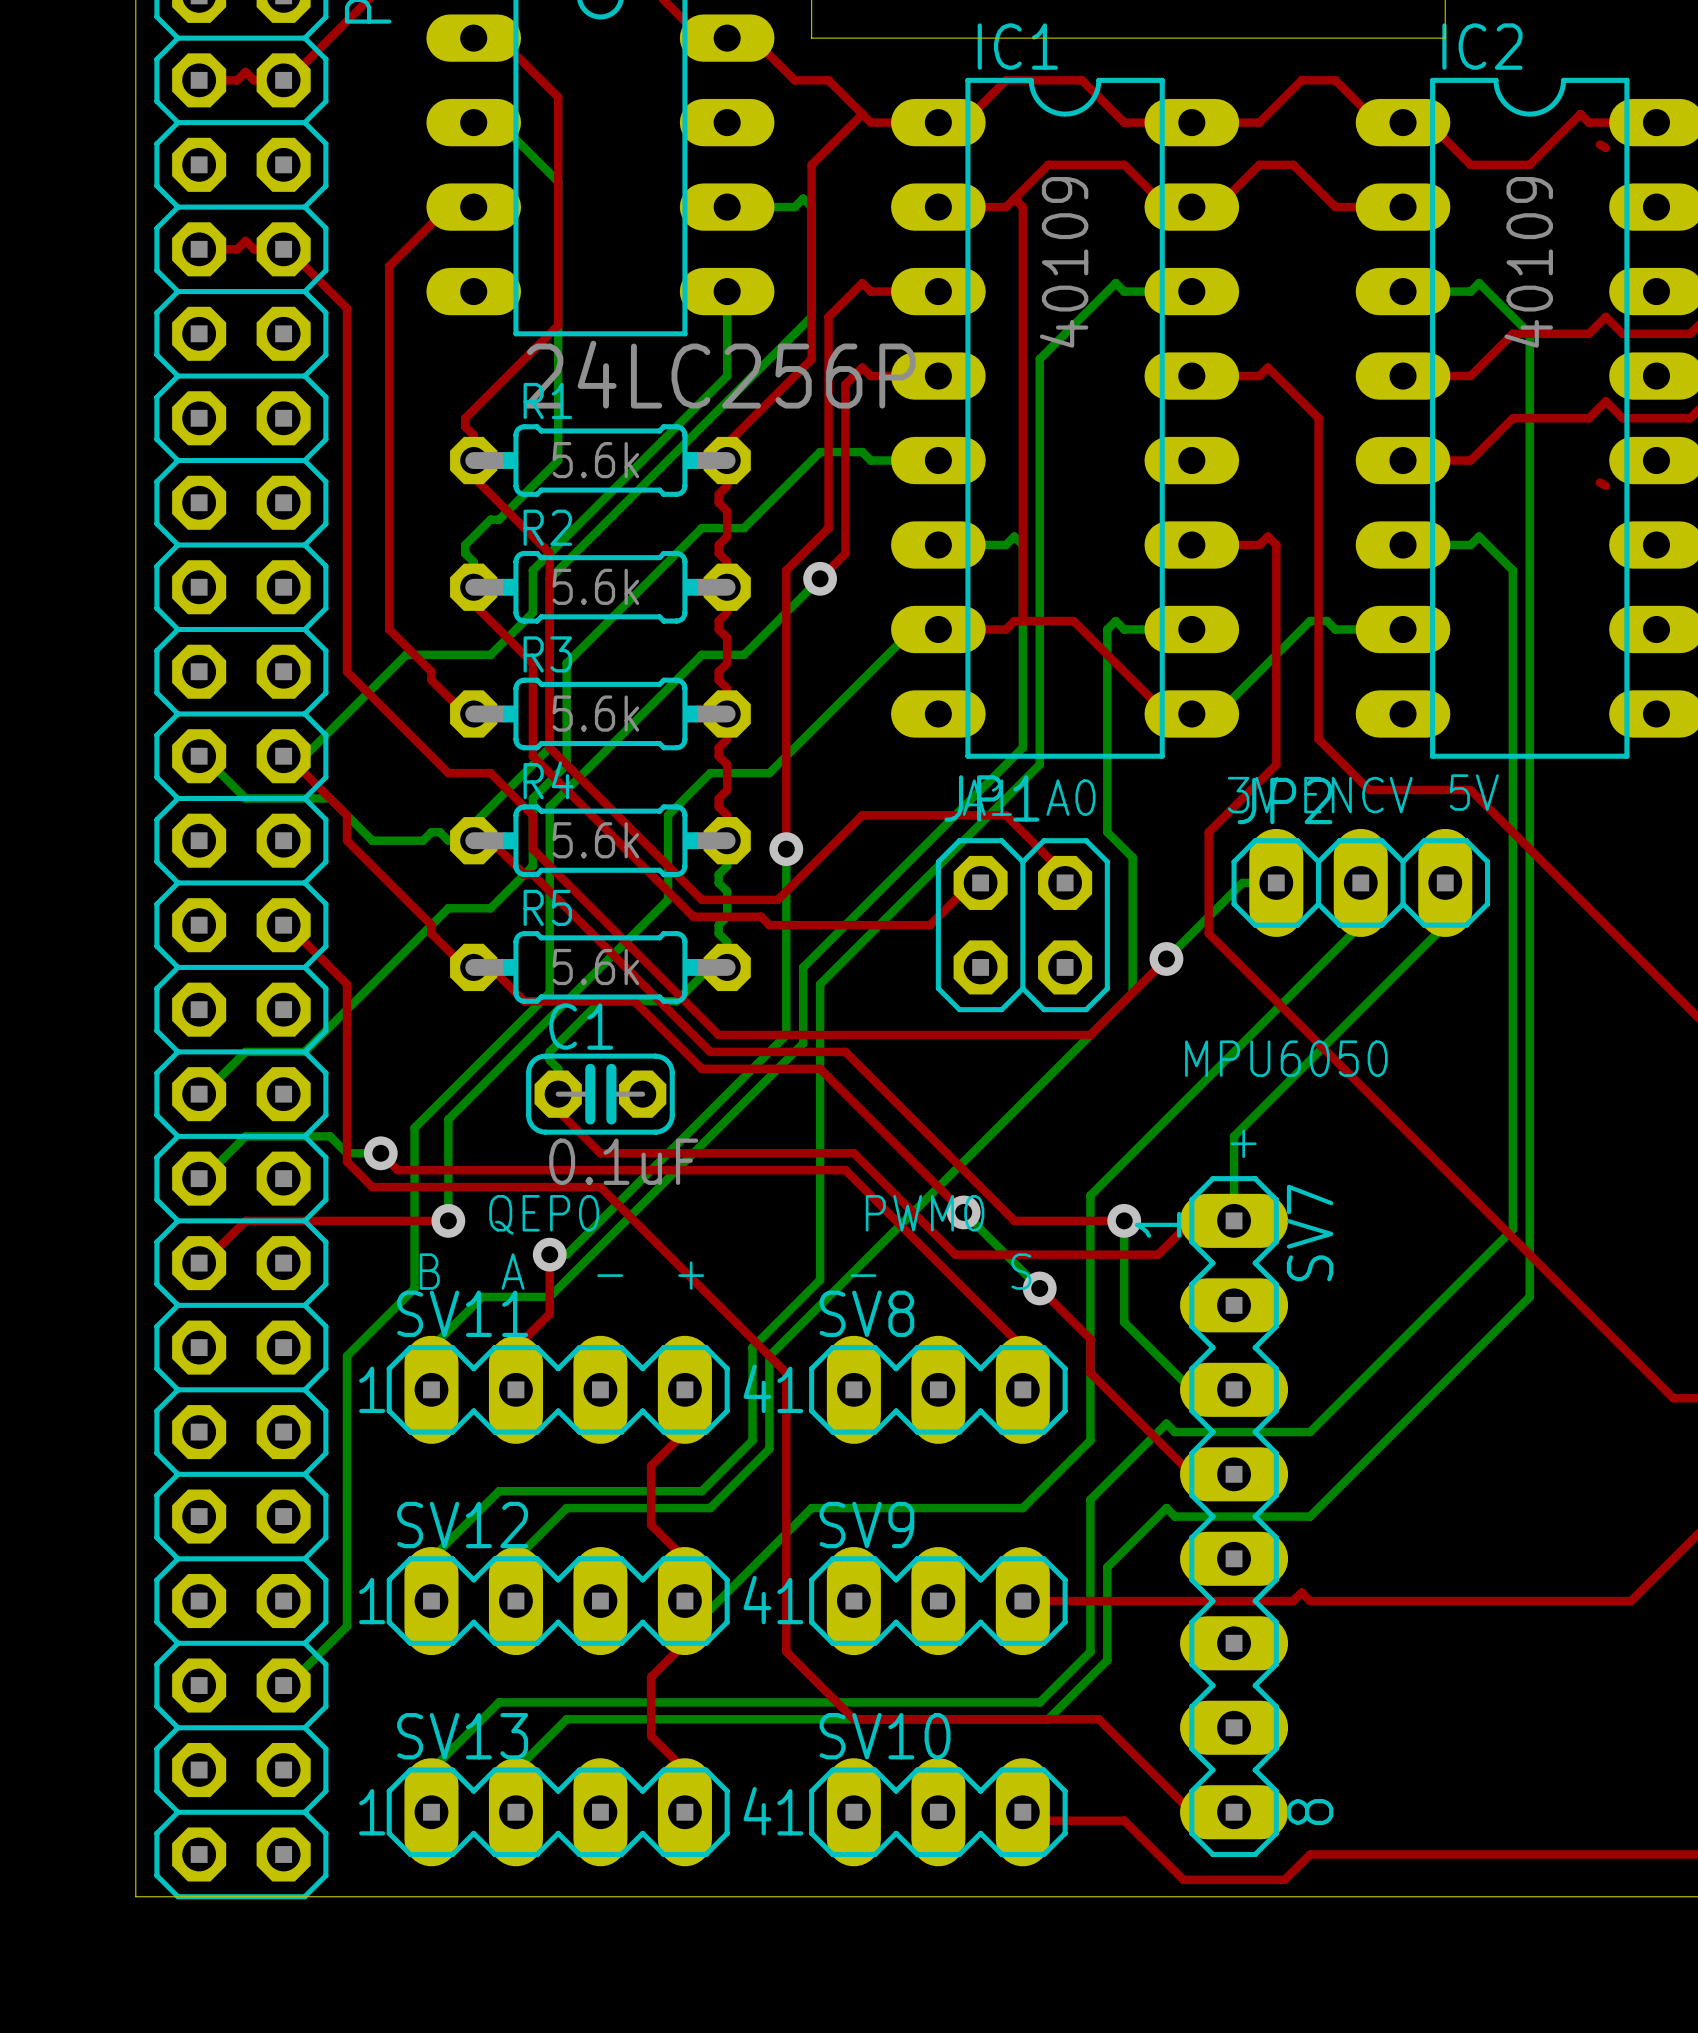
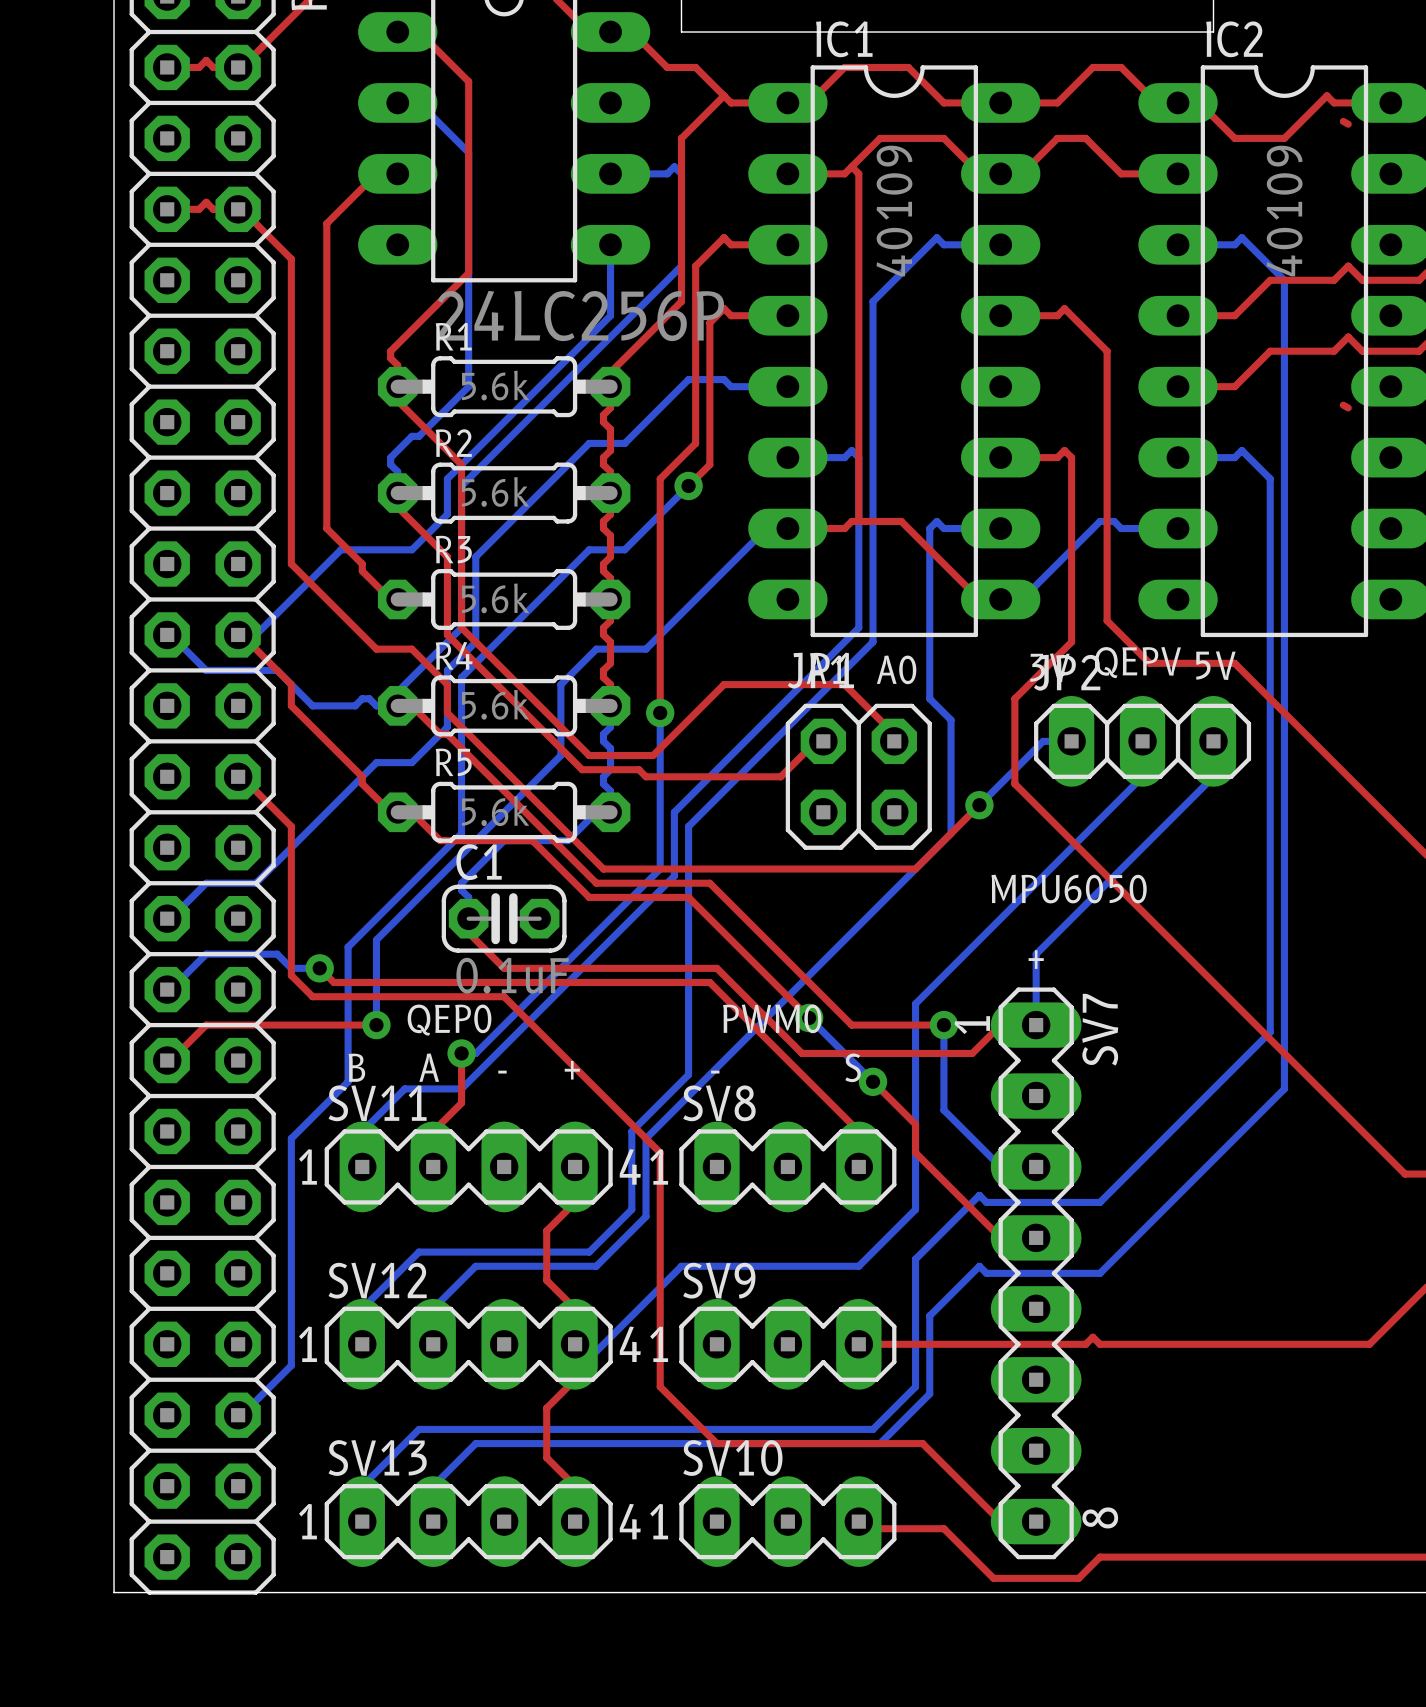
text position: 5V (1474, 792) -> 5V (1215, 665)
text: ENCV (1358, 795) -> QEPV (1137, 662)

